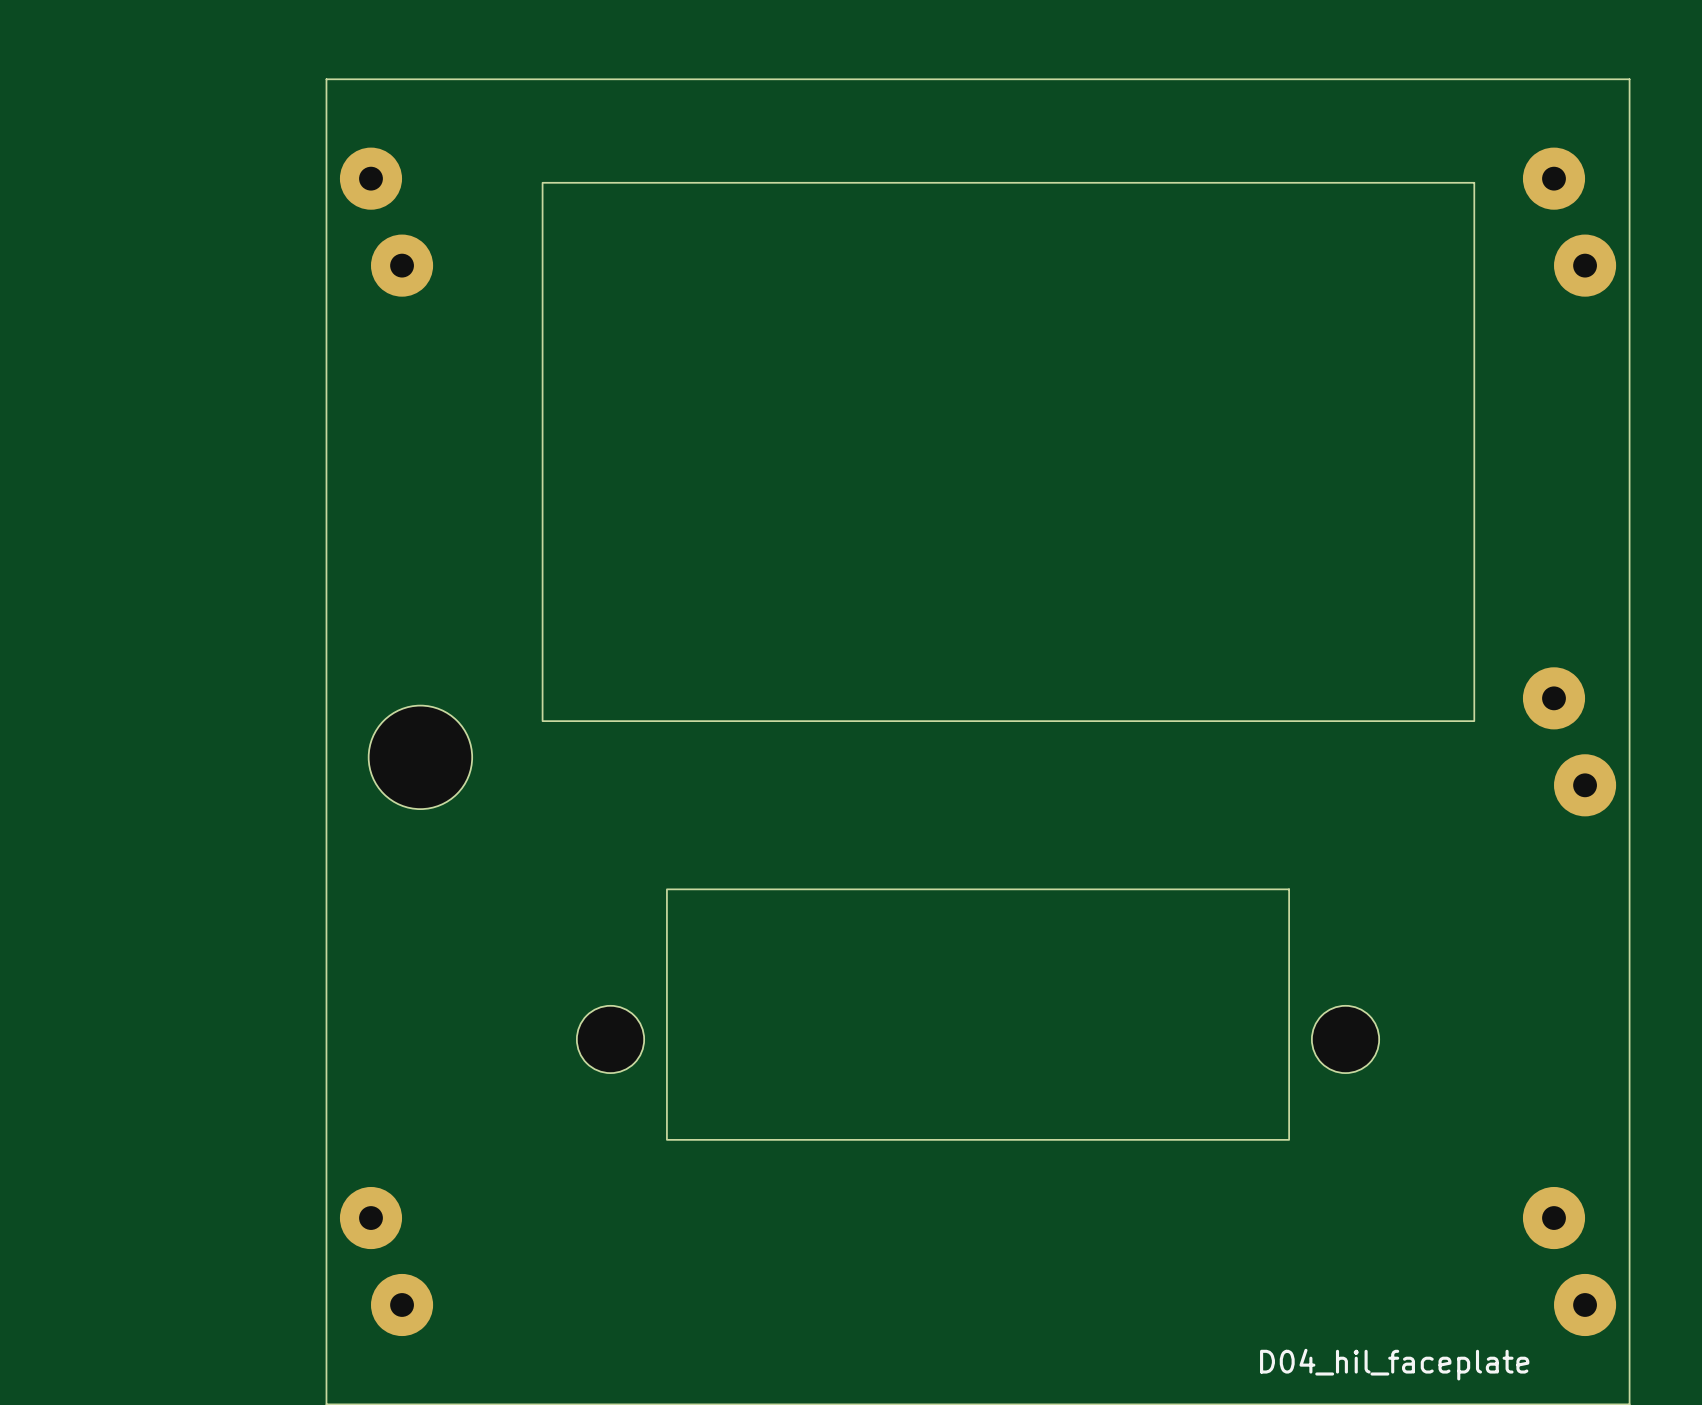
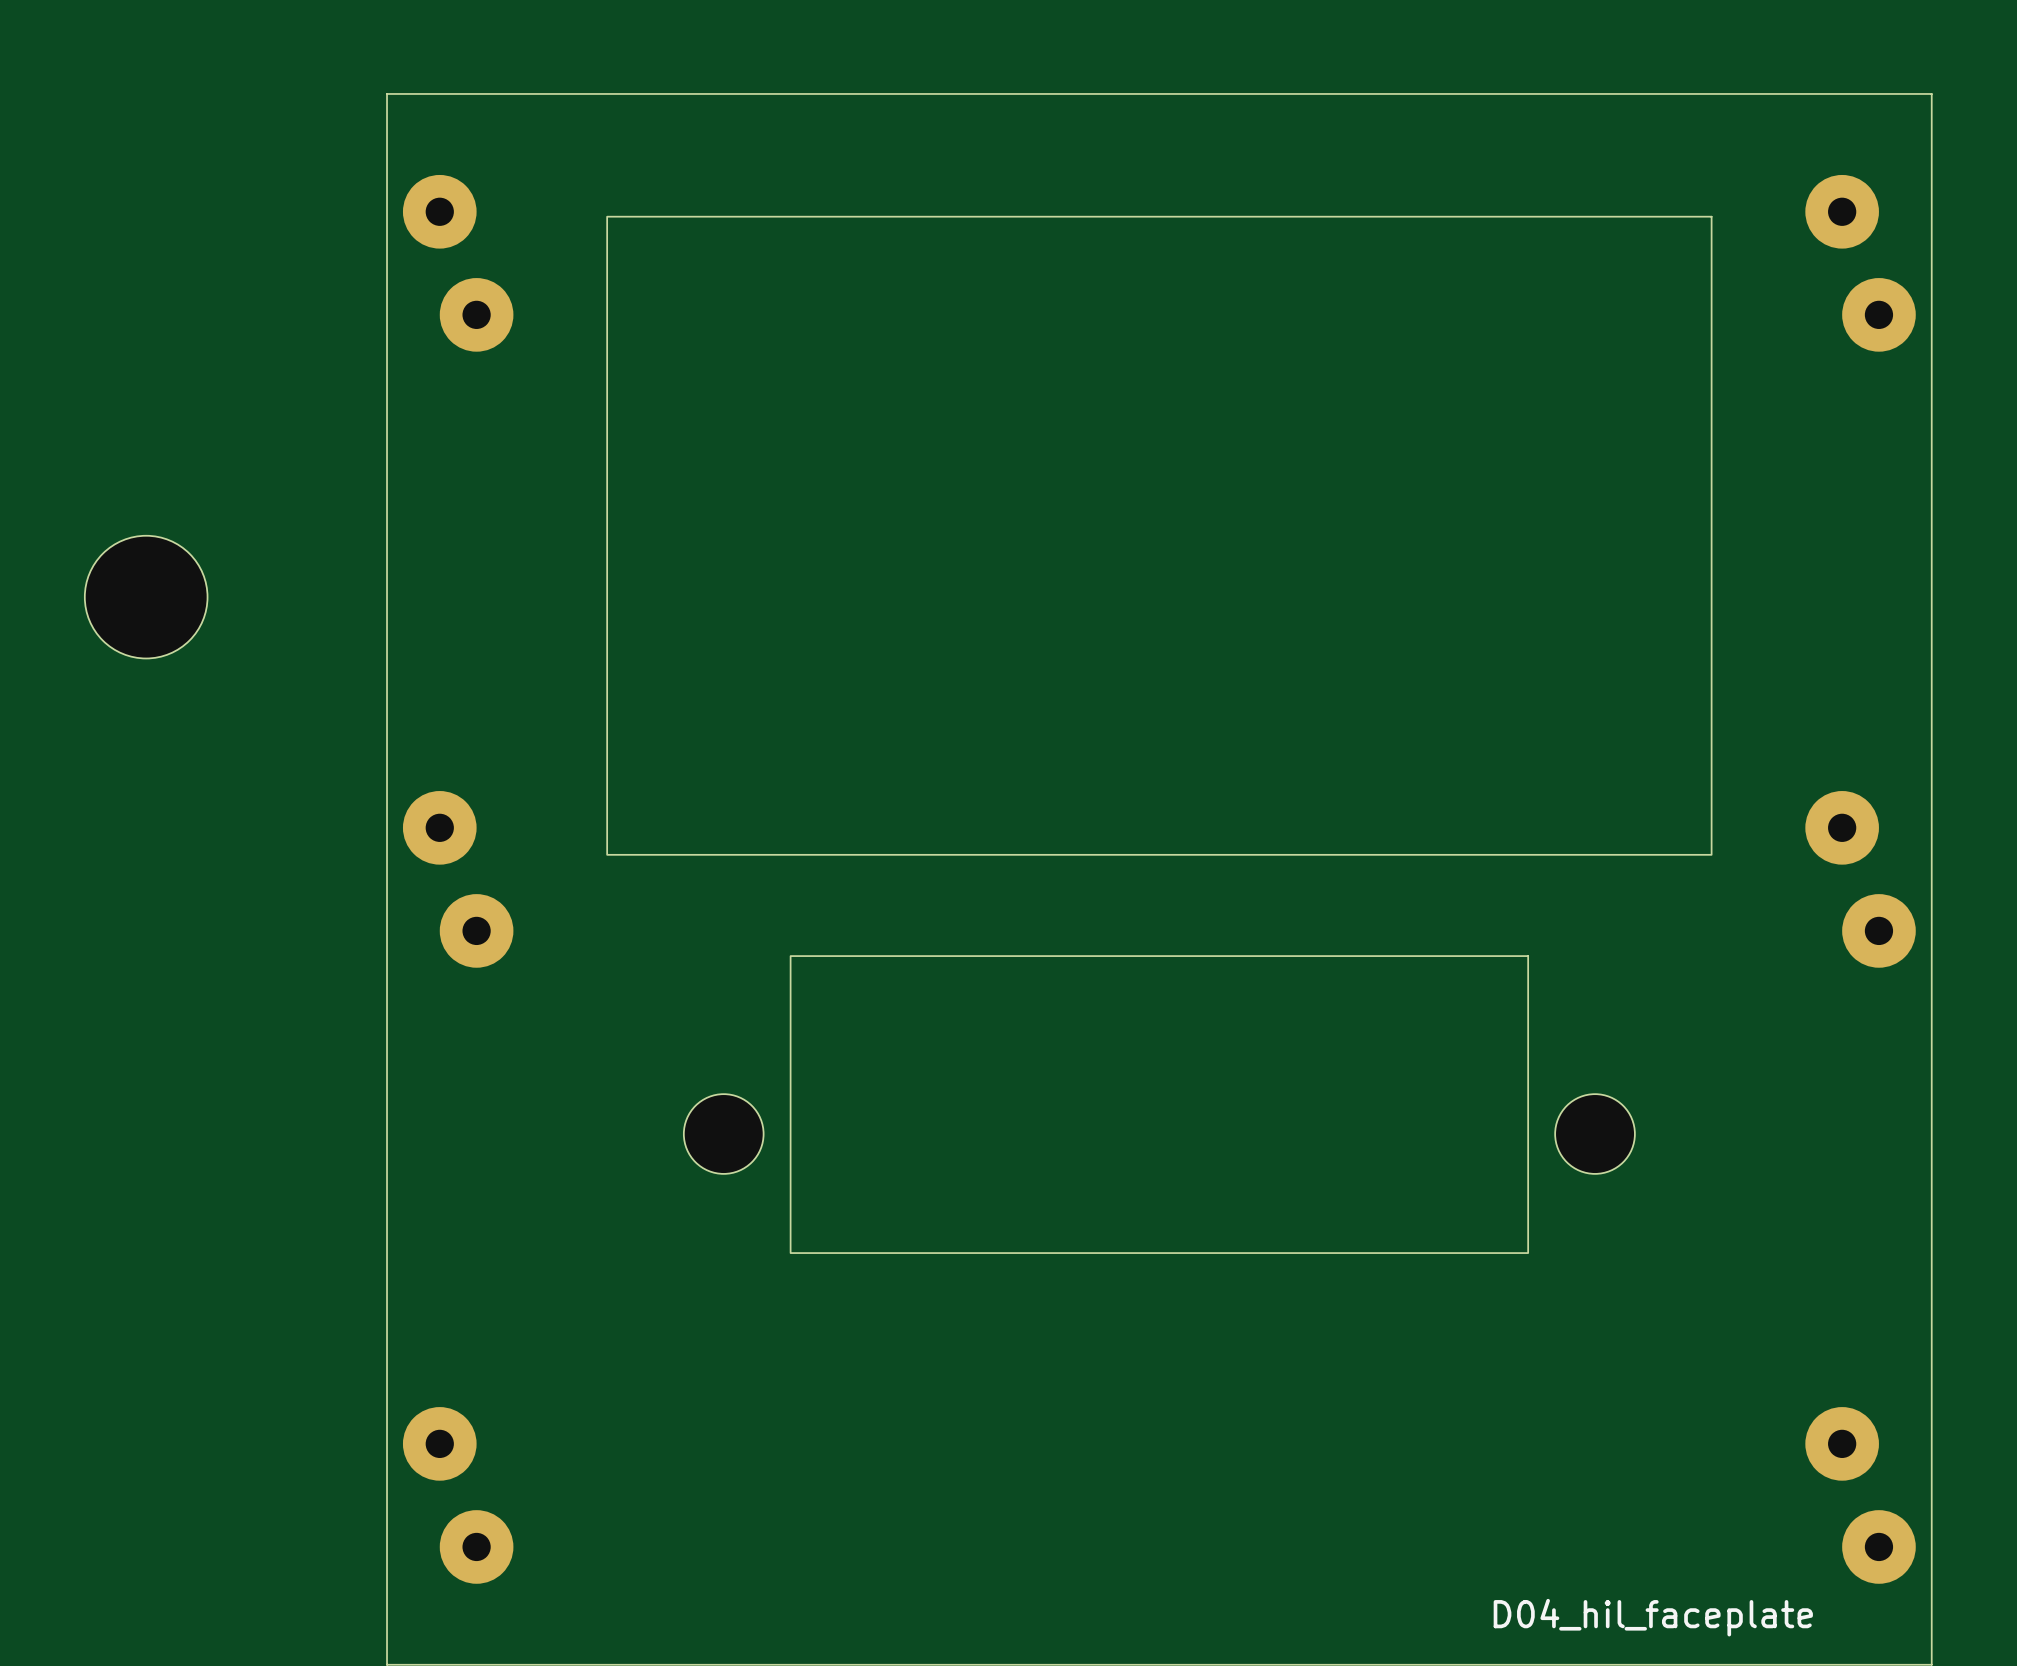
drawing position: (1008, 451) -> (1159, 535)
part: none -> (439, 827)
part position: (420, 757) -> (146, 597)
part: none -> (476, 930)
part position: (978, 1014) -> (1159, 1104)

